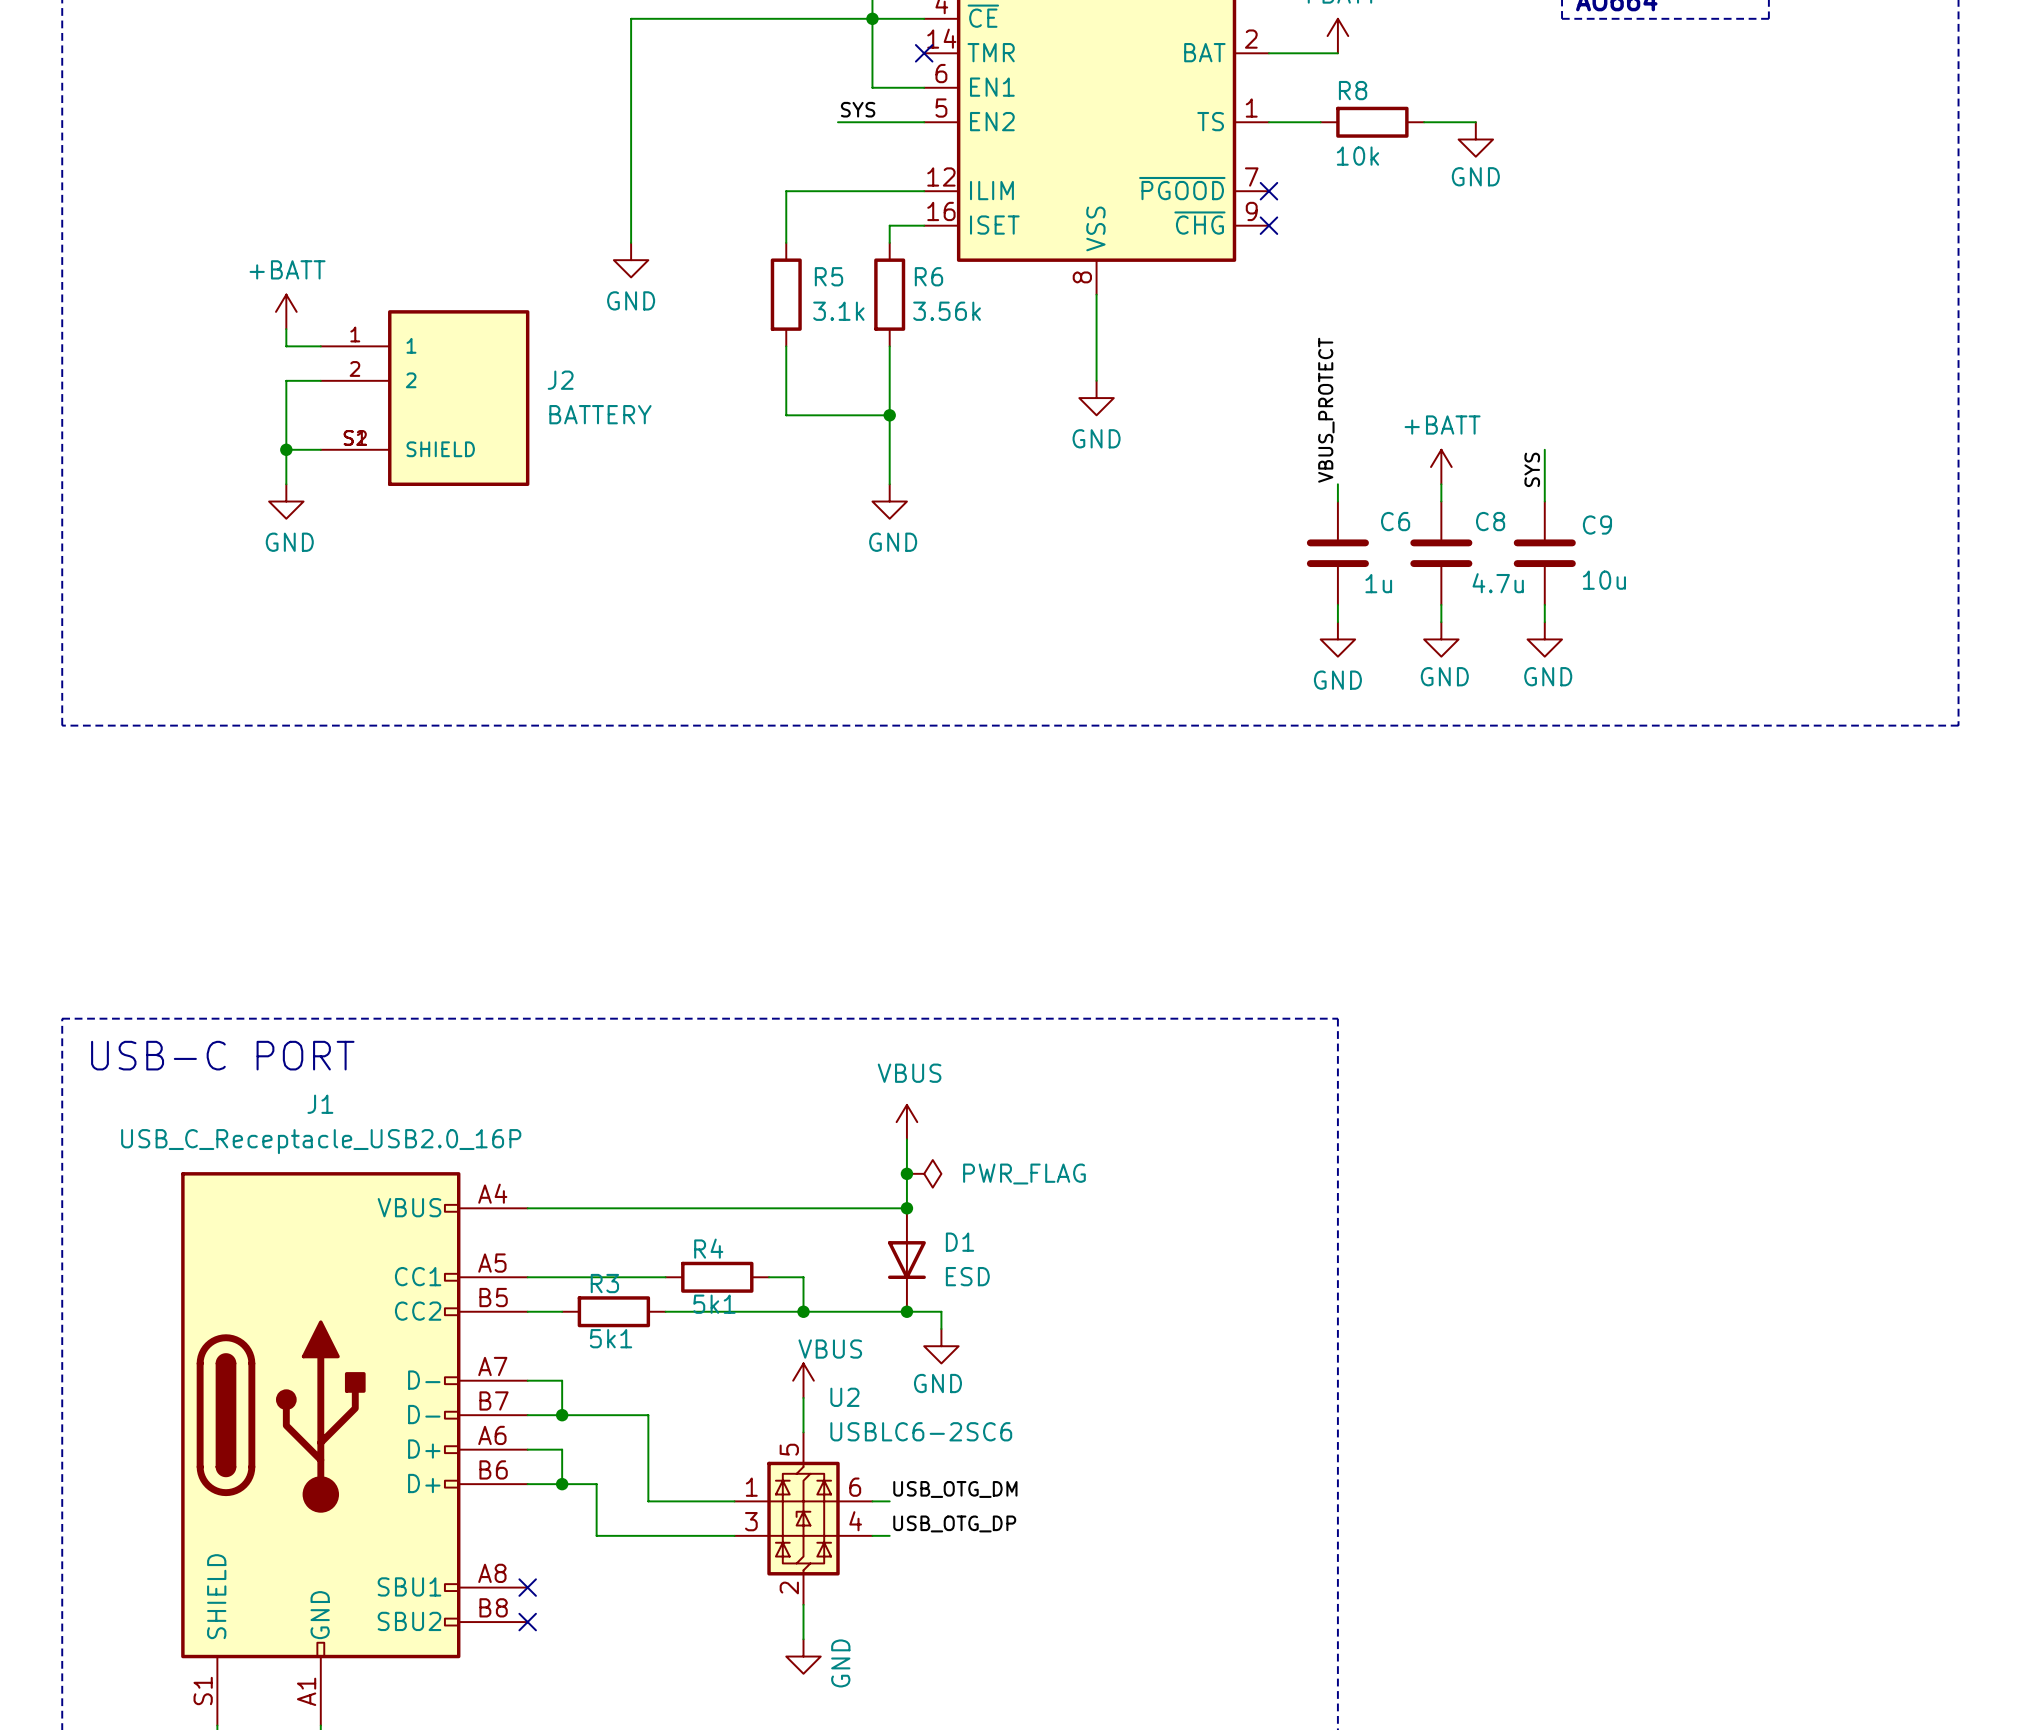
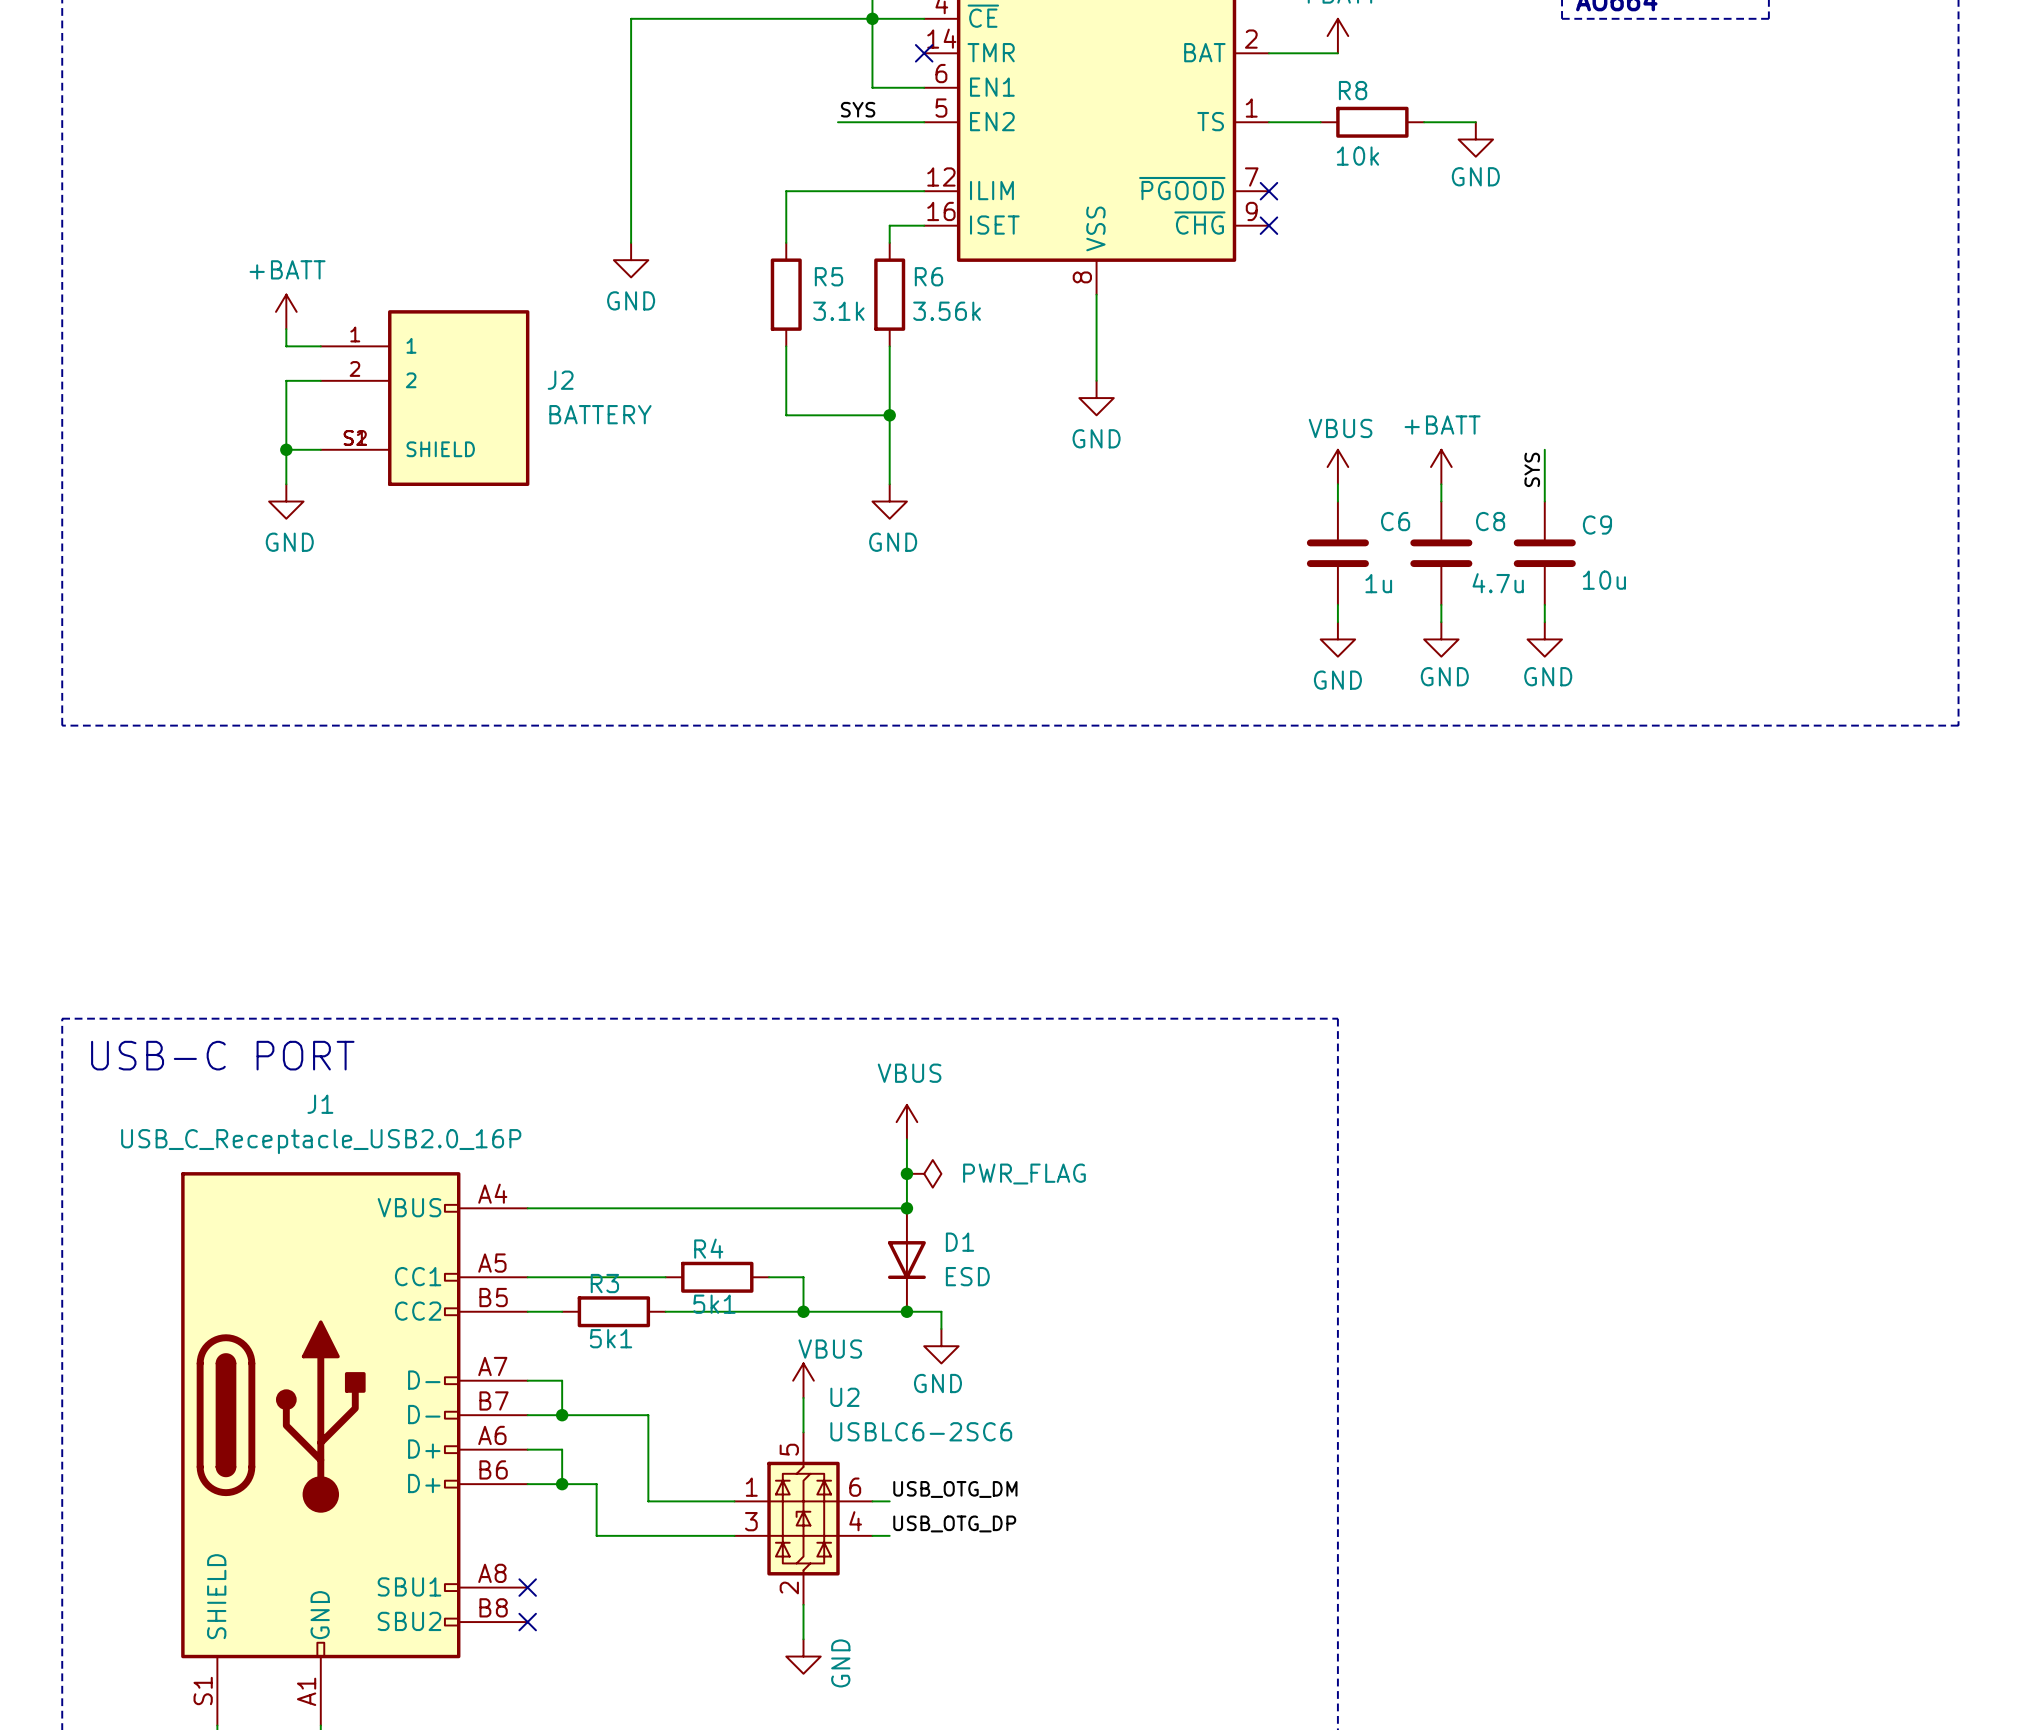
label: VBUS_PROTECT (1326, 410) -> none
power symbol: none -> VBUS (1337, 467)

